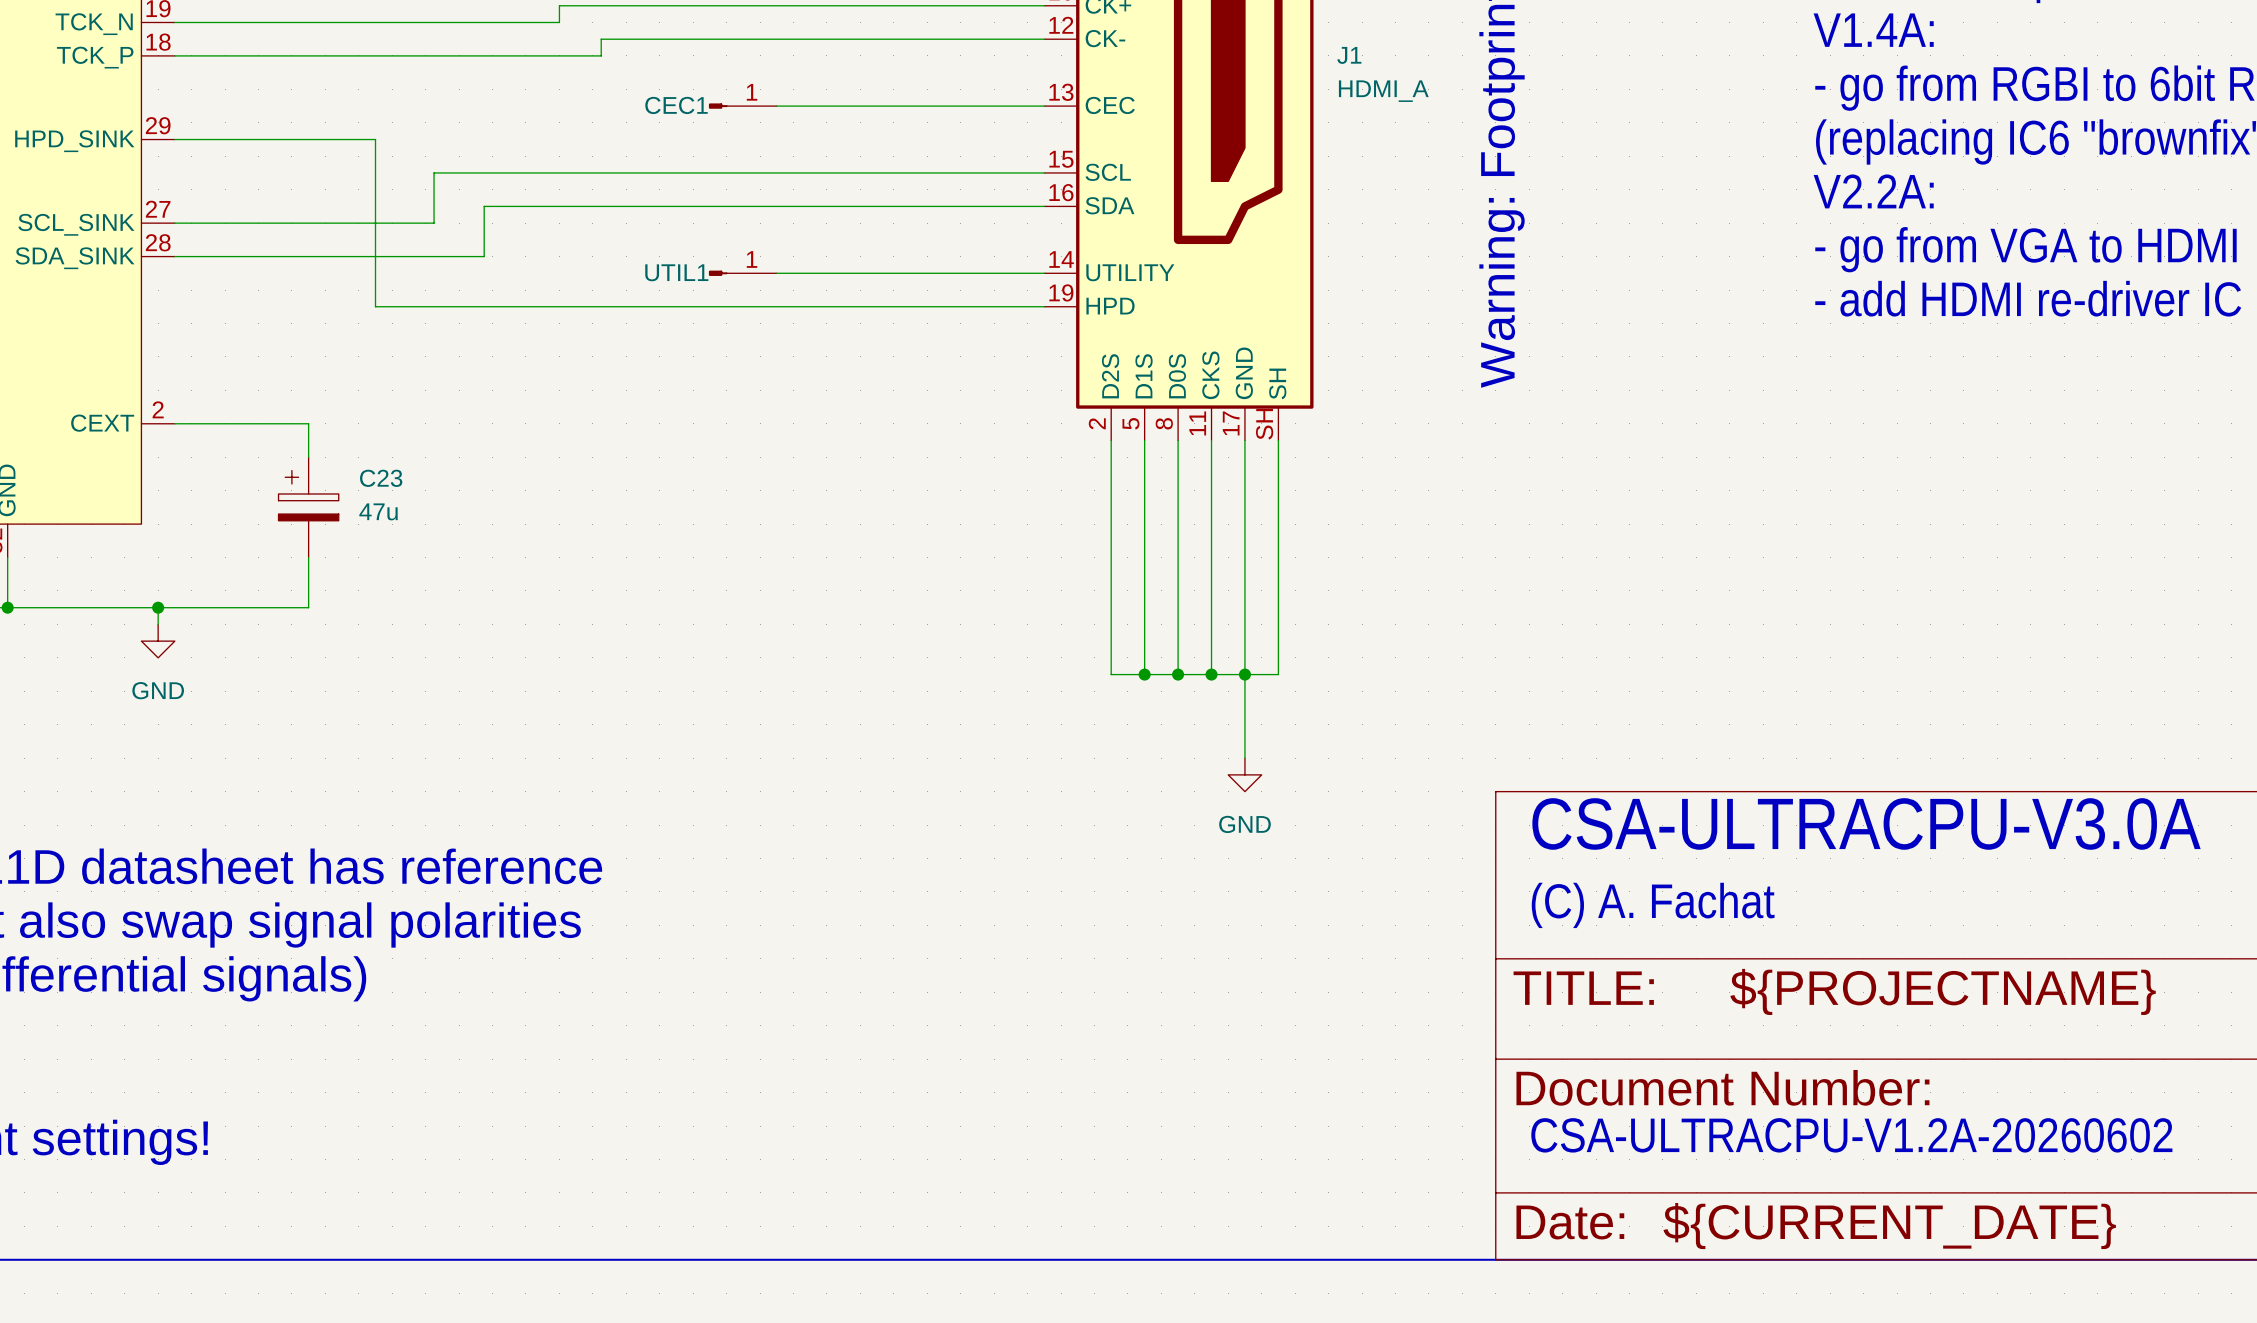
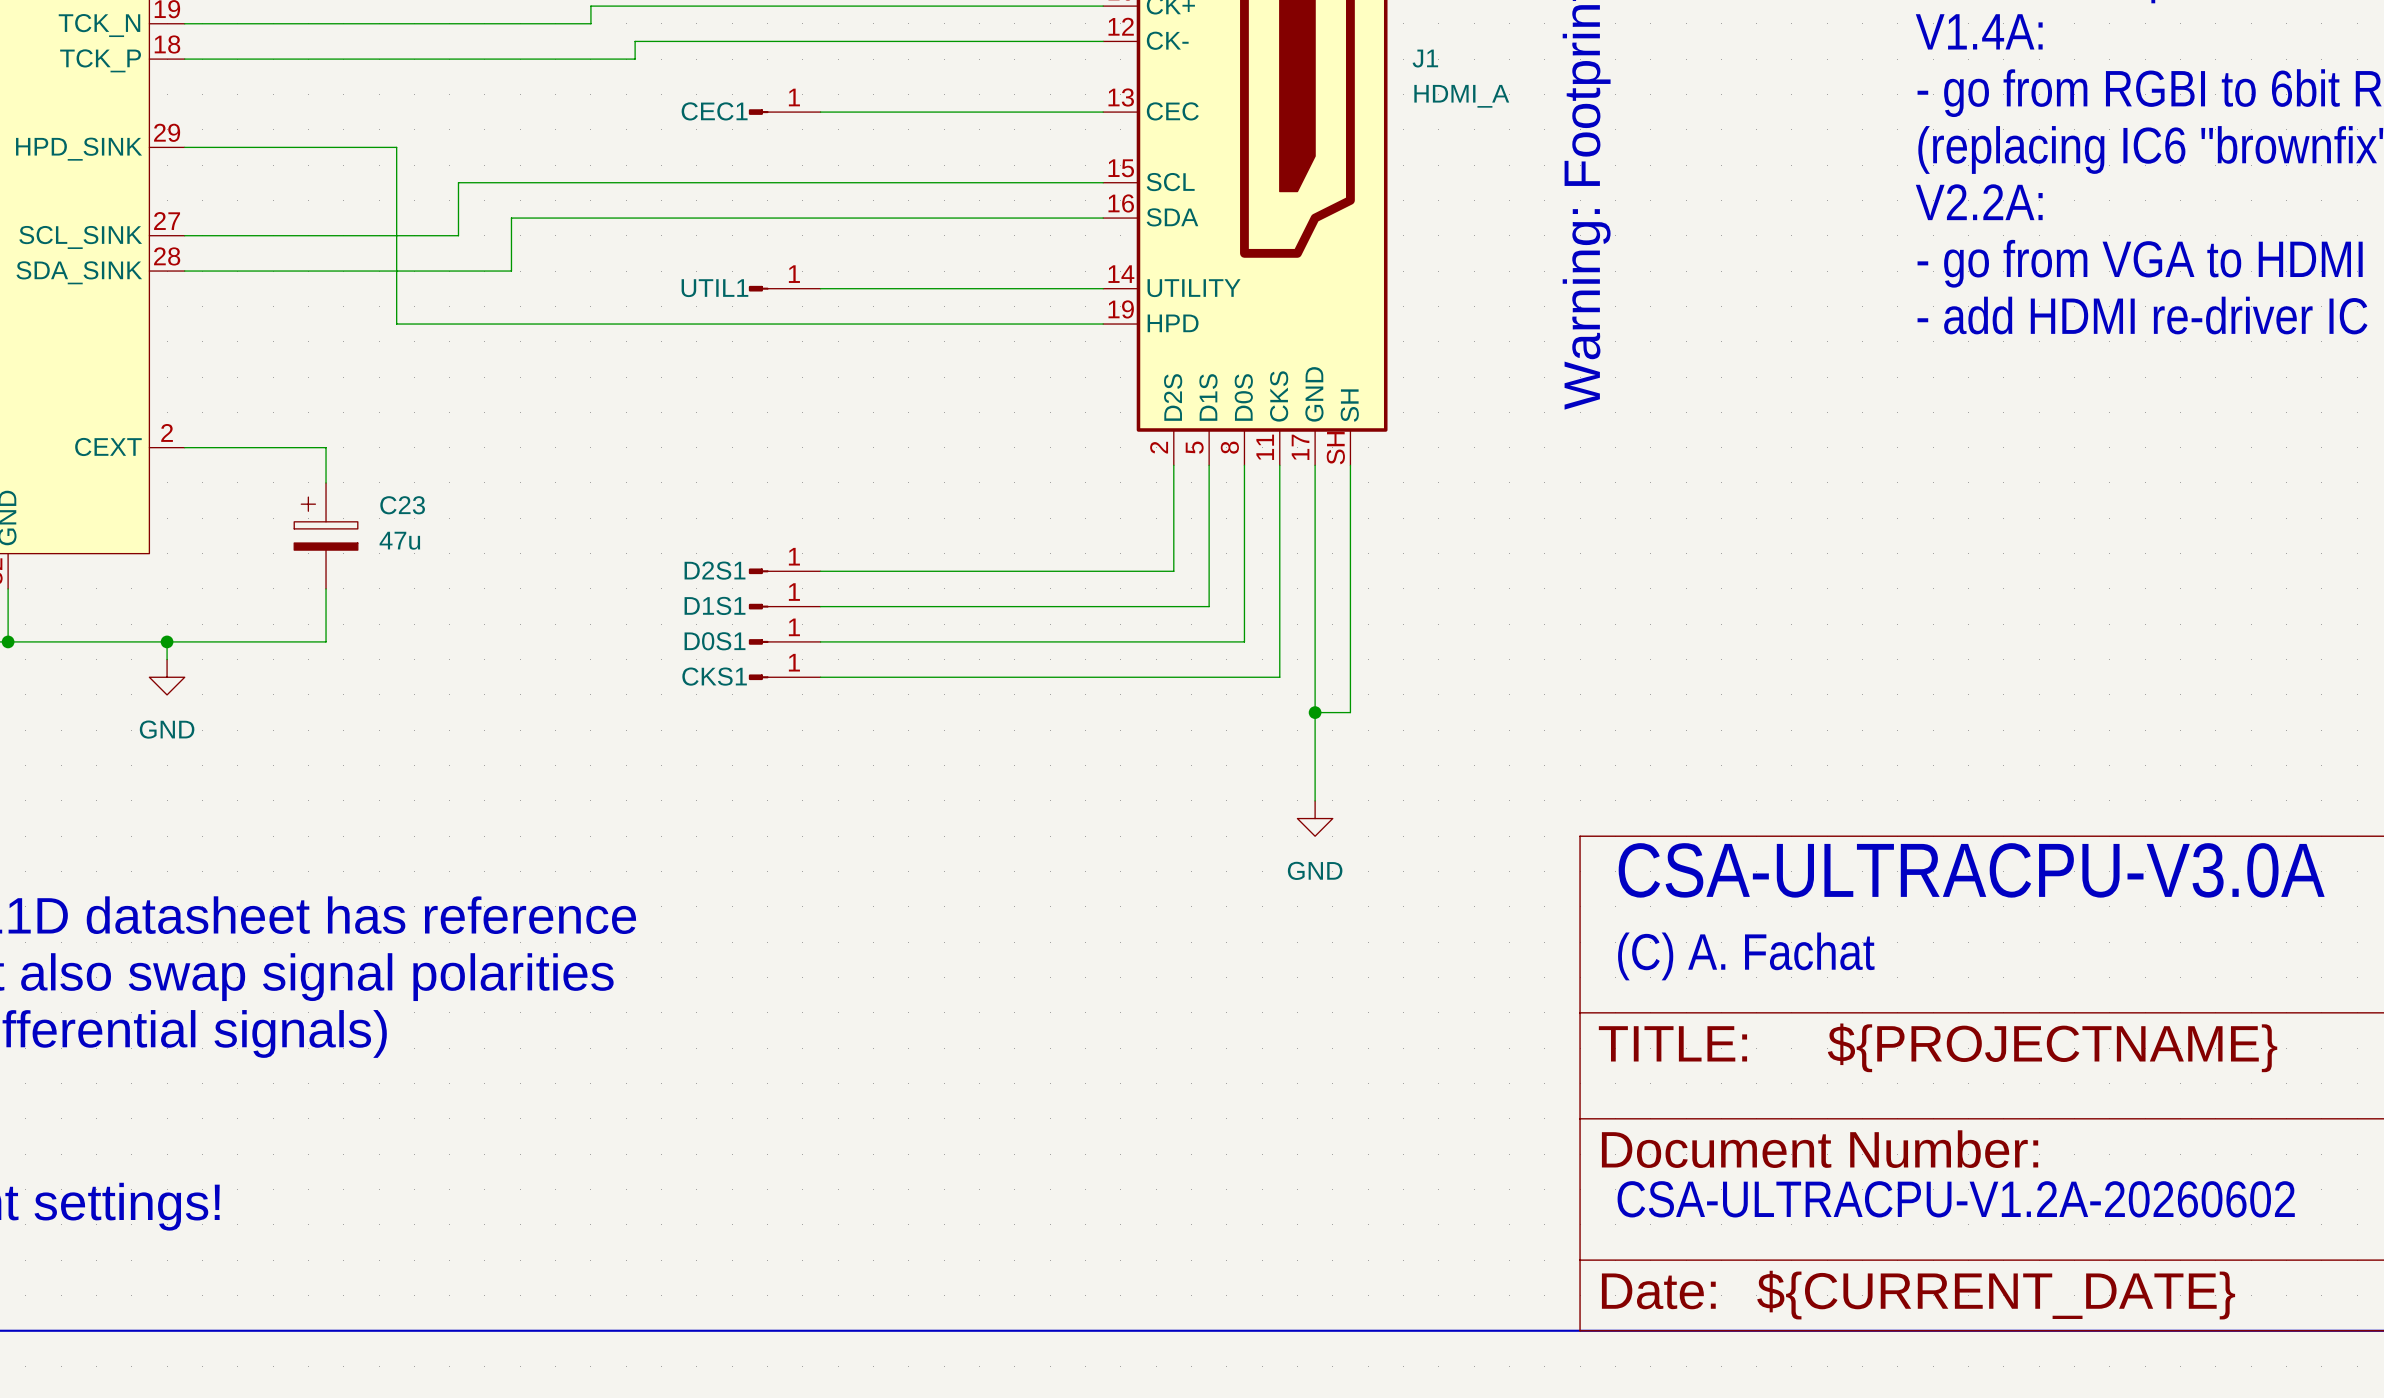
D2S1: none -> (784, 571)
wire: (1111, 540) (1111, 674) (1244, 674) -> (1173, 571) (820, 571)
D1S1: none -> (784, 606)
wire: (1144, 574) (1144, 674) -> (1209, 606) (820, 606)
D0S1: none -> (784, 641)
wire: (1178, 607) (1178, 674) -> (1244, 641) (820, 641)
CKS1: none -> (784, 677)
wire: (1211, 641) (1211, 674) -> (1279, 677) (820, 677)
junction: (1144, 674) -> none
junction: (1178, 674) -> none
junction: (1211, 674) -> none

